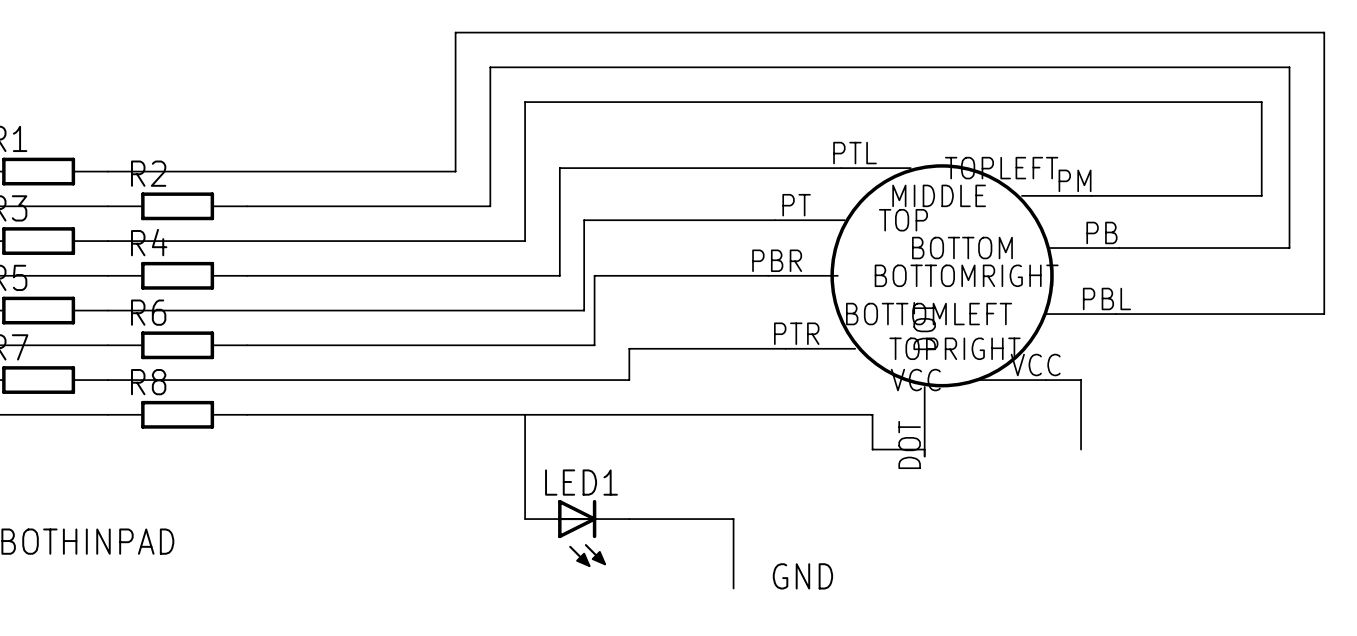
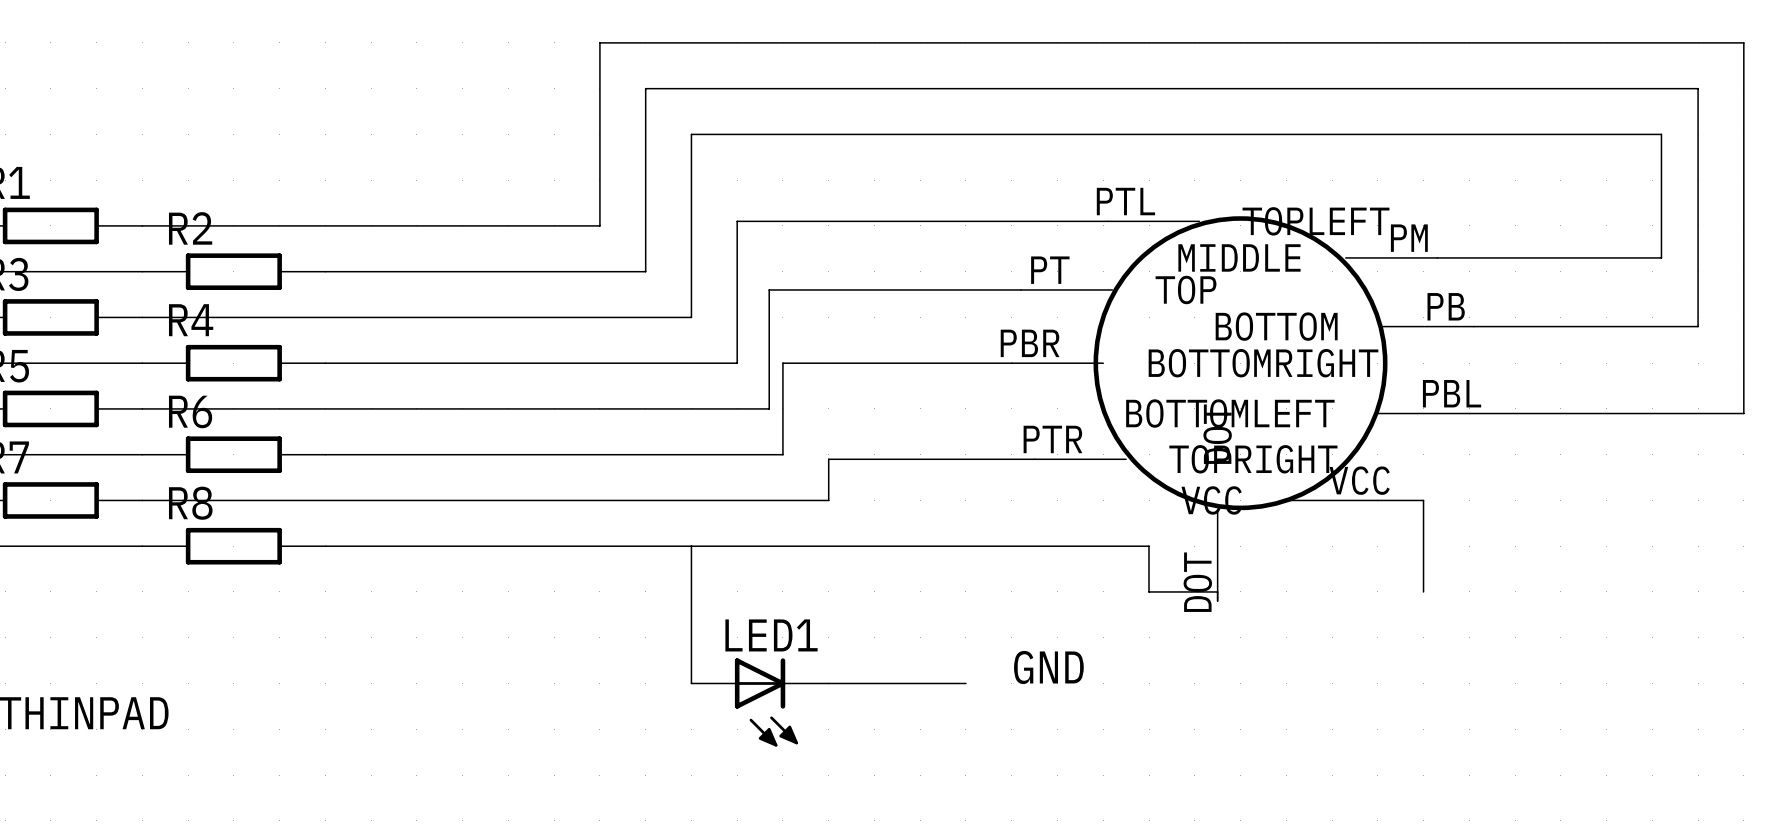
wire: (733, 519) (733, 588) -> none
label position: GND (802, 576) -> GND (1048, 667)

